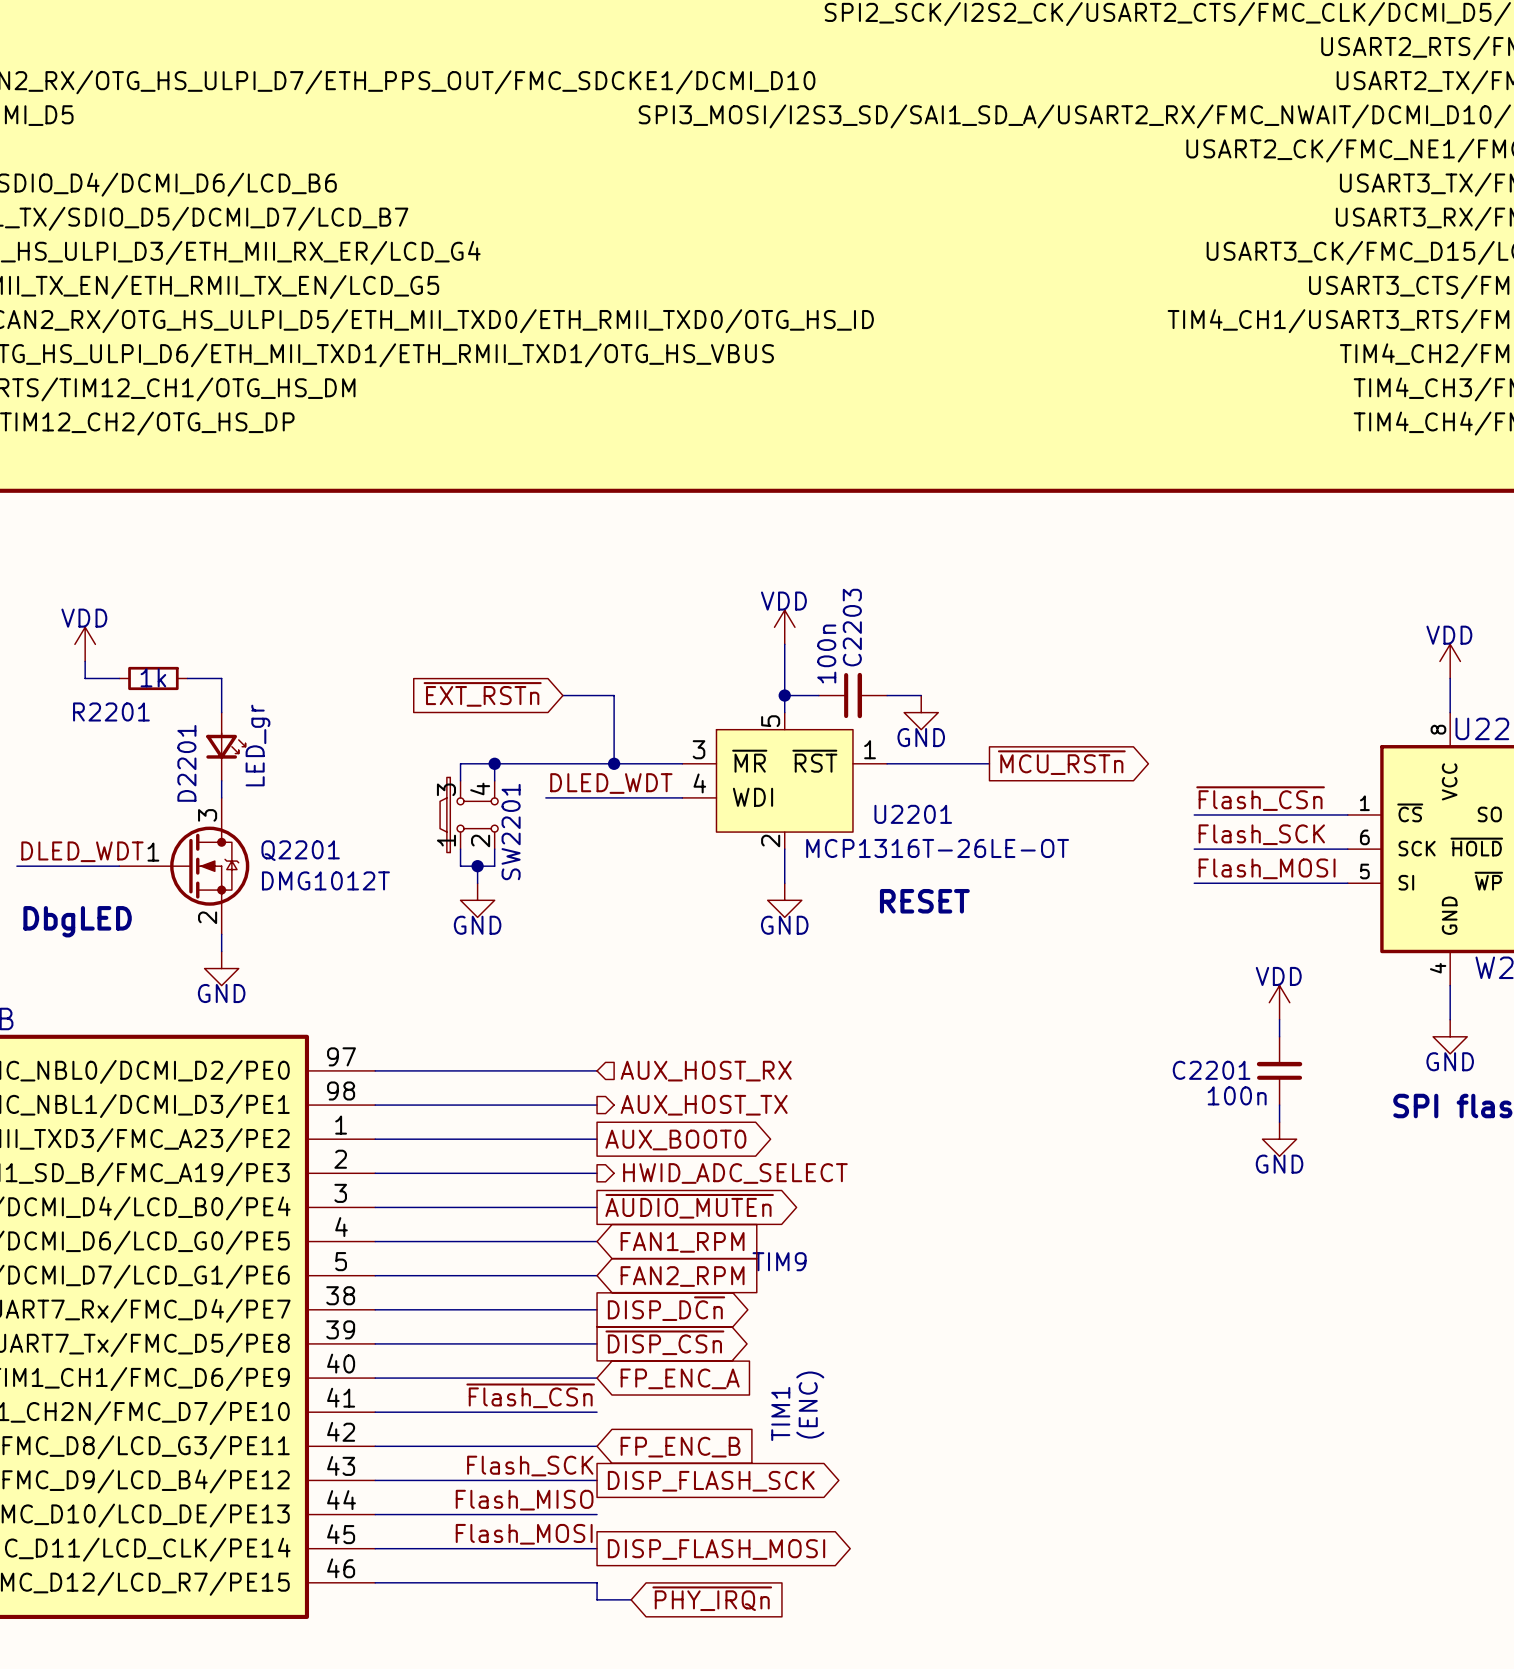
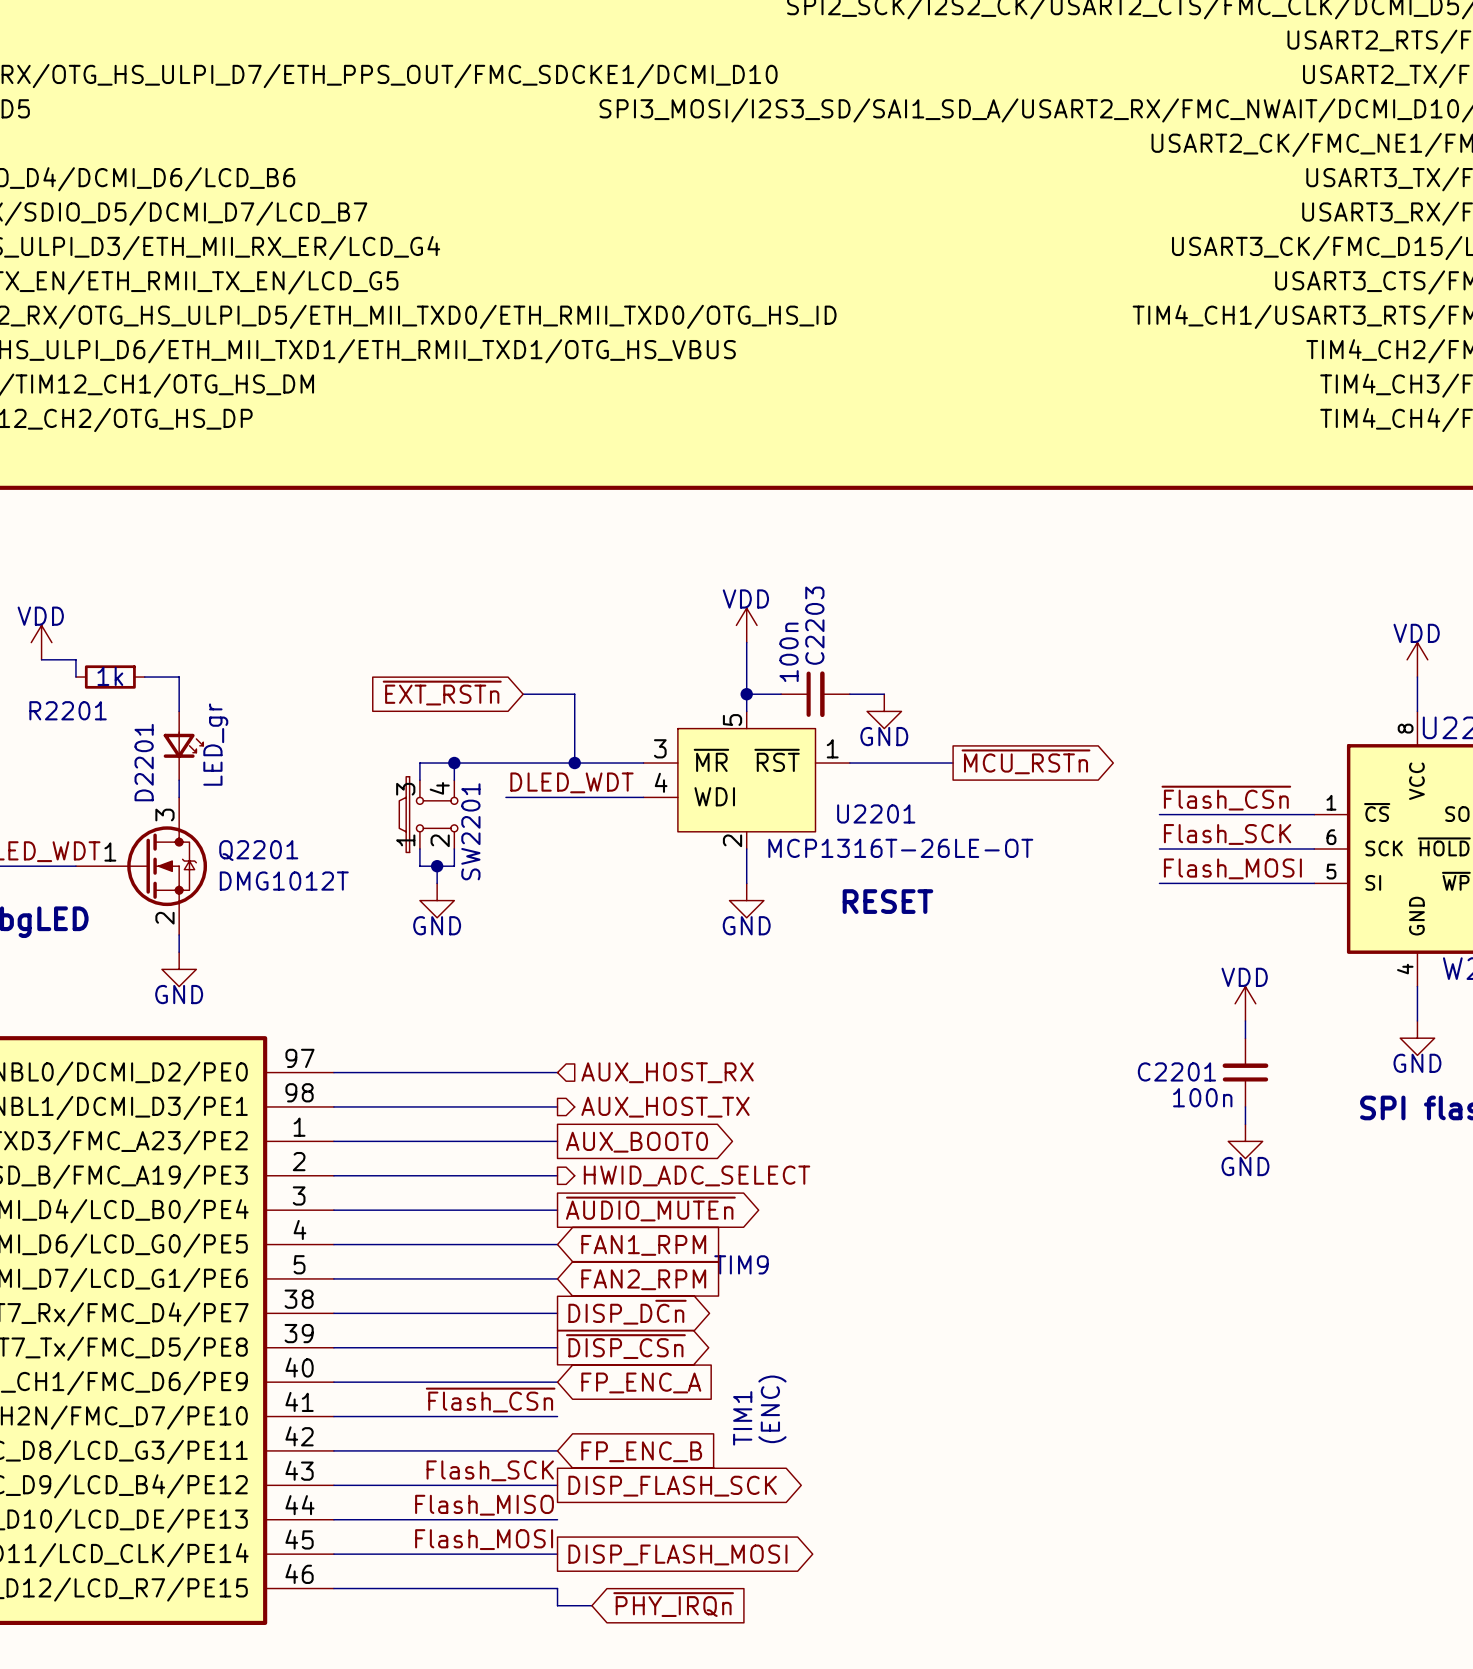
wire: (85, 661) (85, 678) (119, 678) -> (41, 659) (75, 659) (75, 677)

